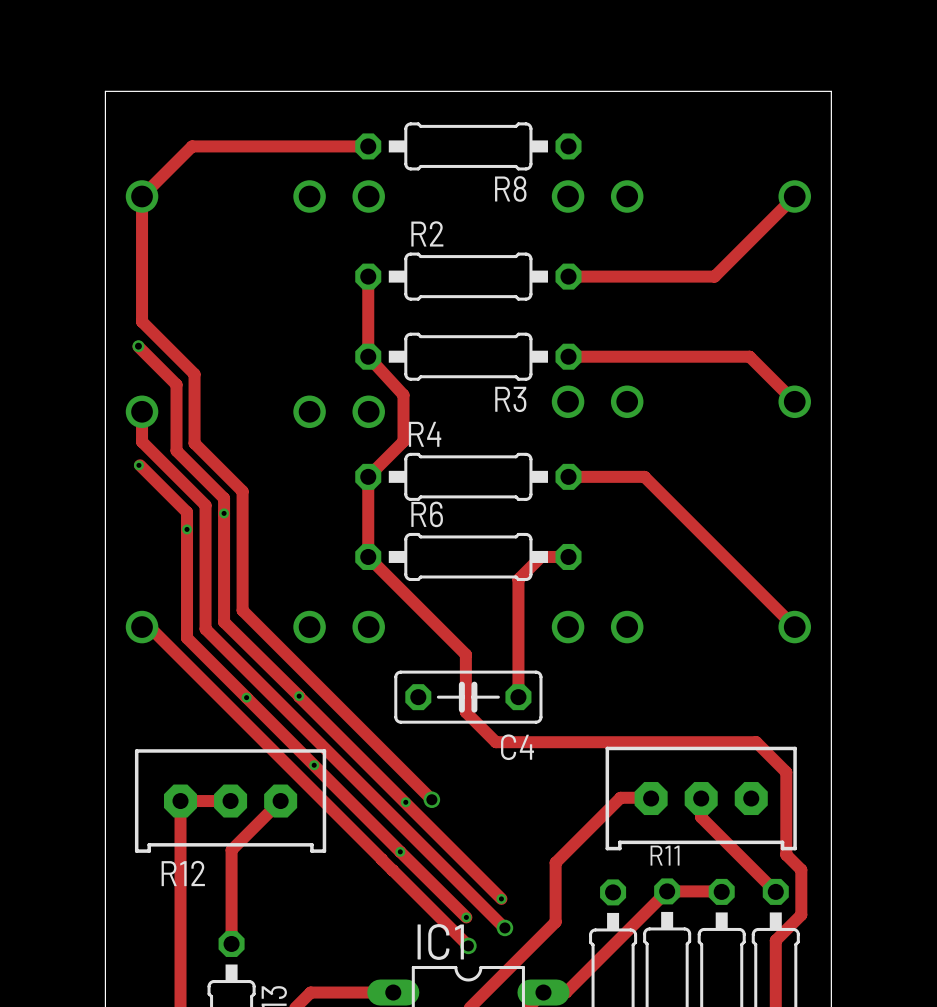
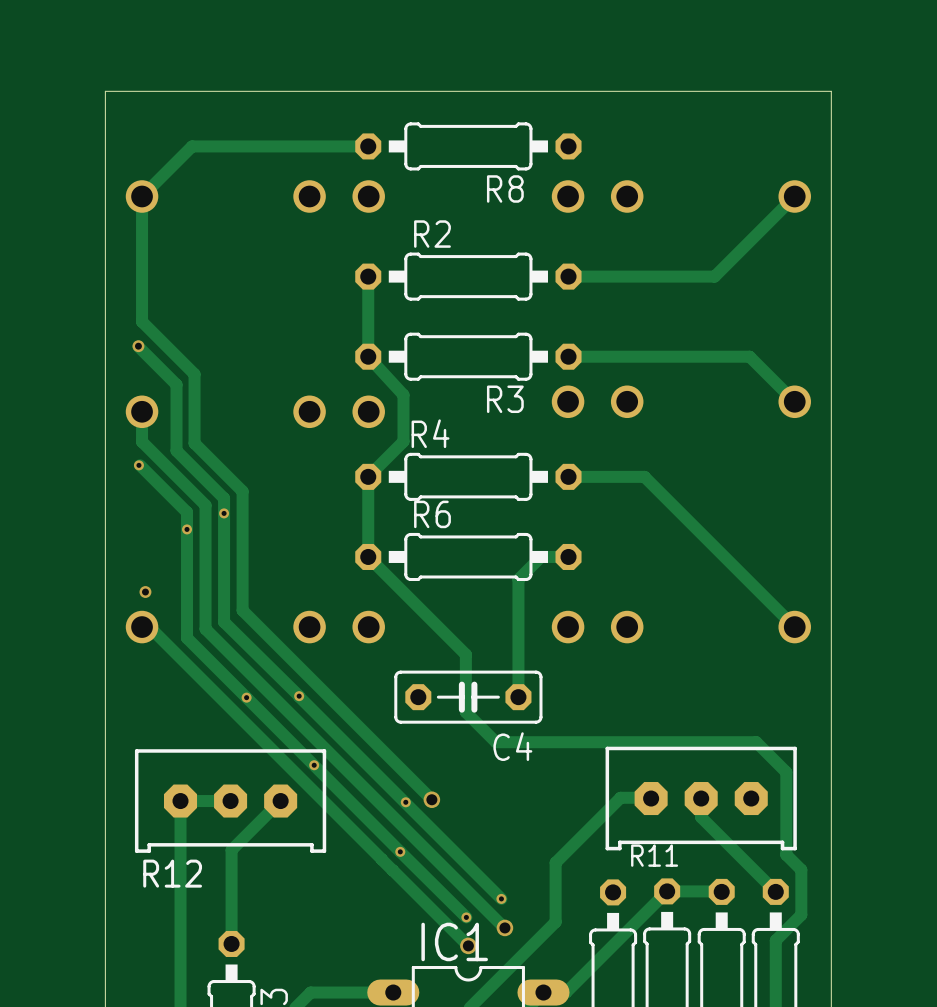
via: none -> (145, 592)

